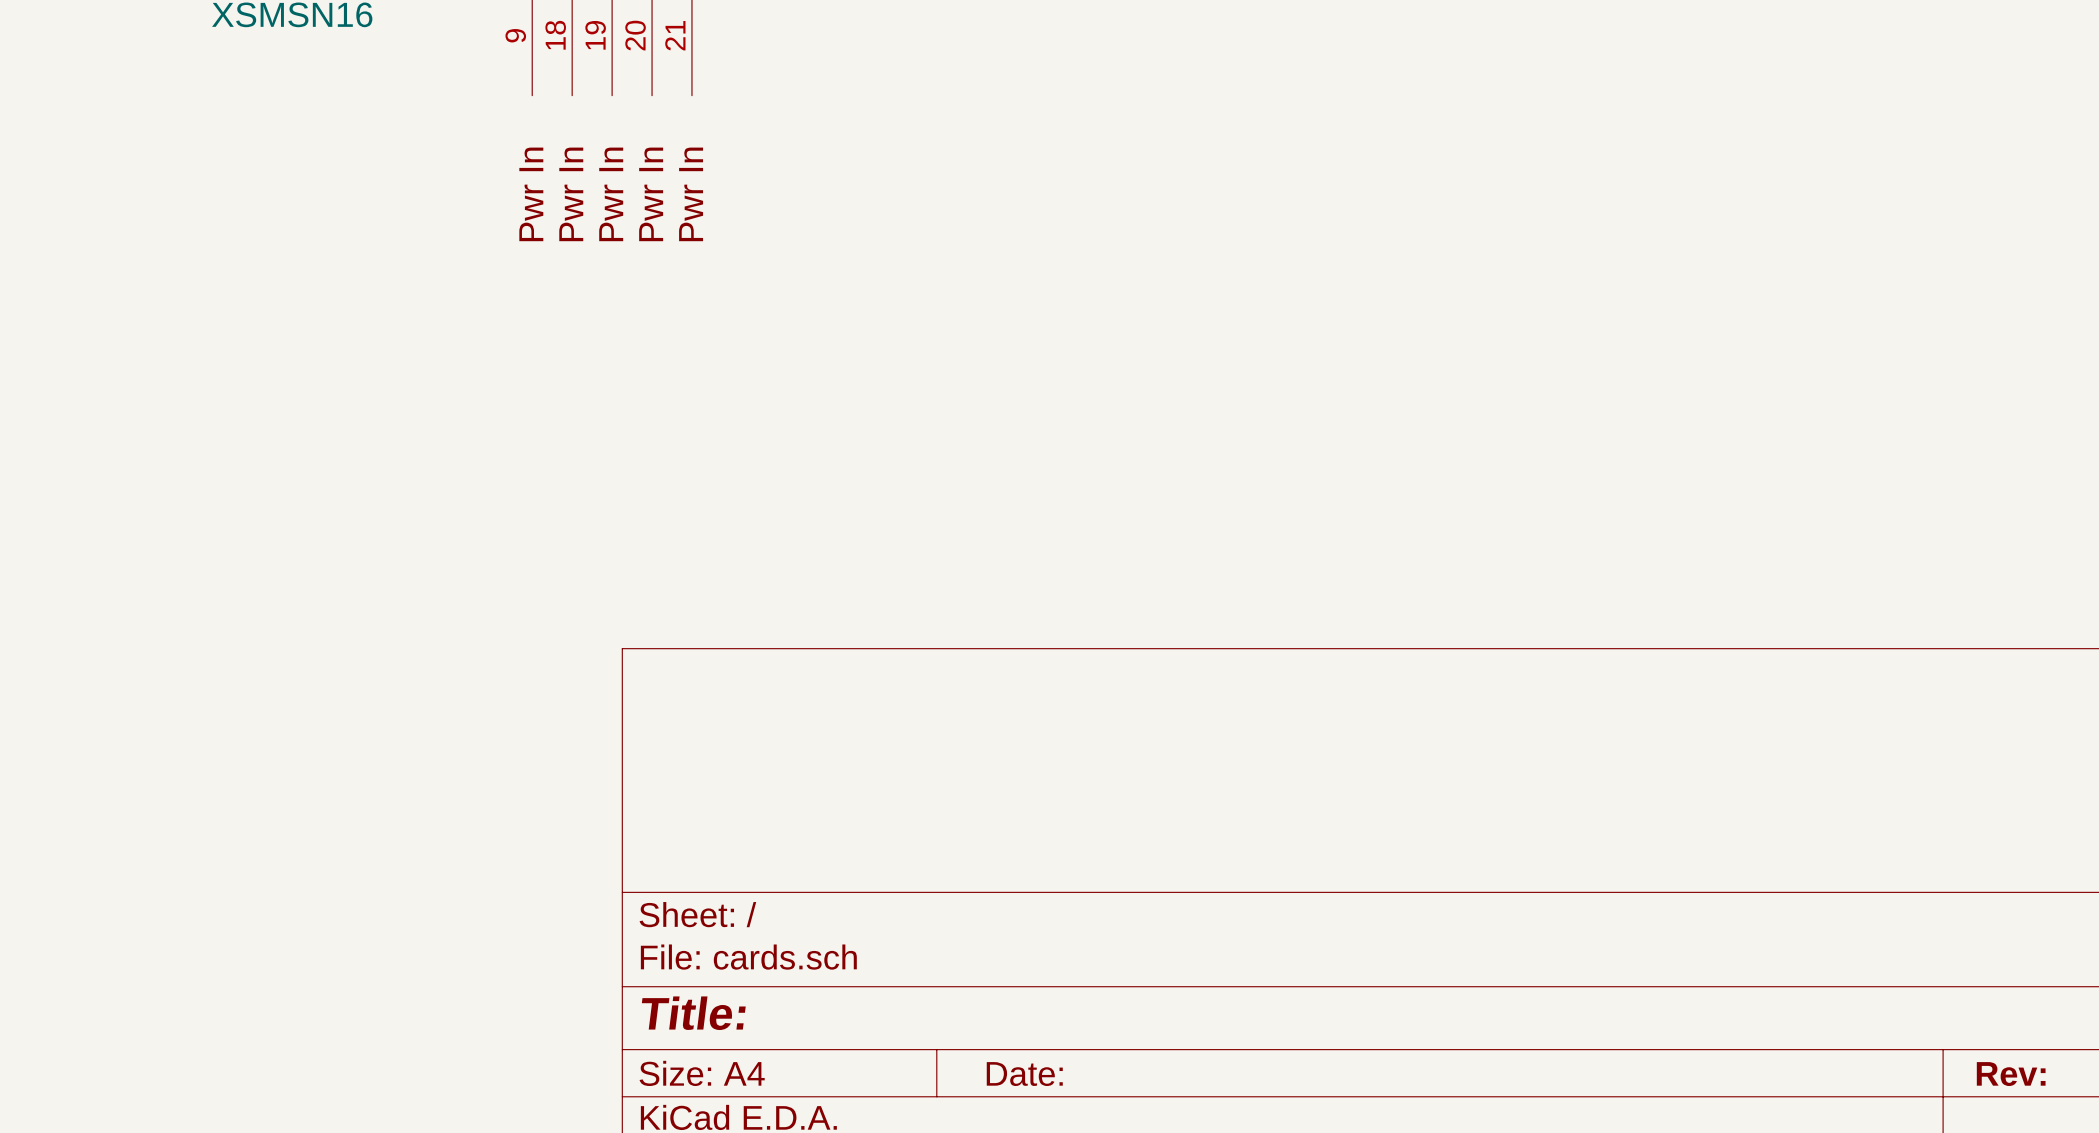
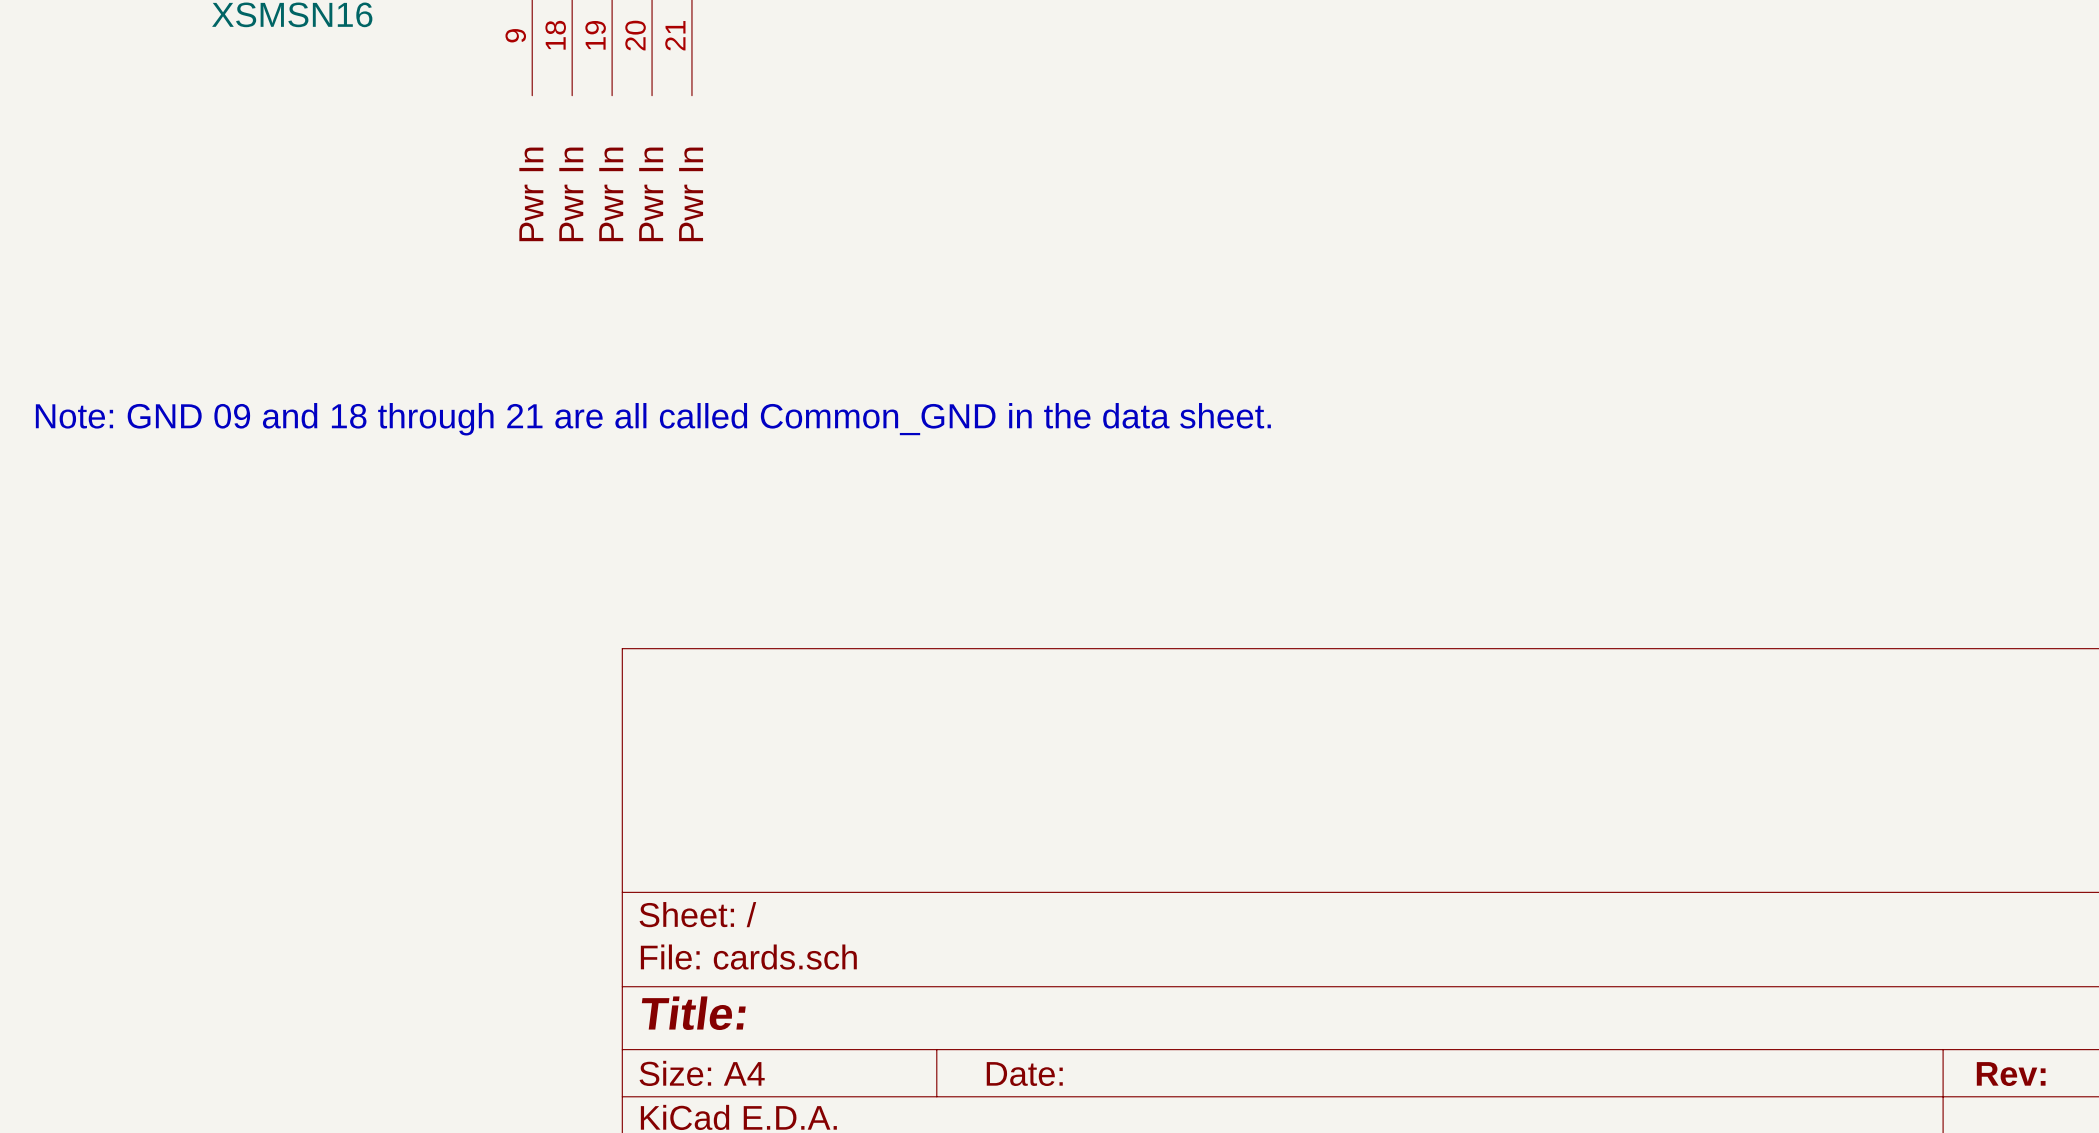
text: none -> Note: GND 09 and 18 through 21 are all called Common_GND in the data sheet. (653, 419)

